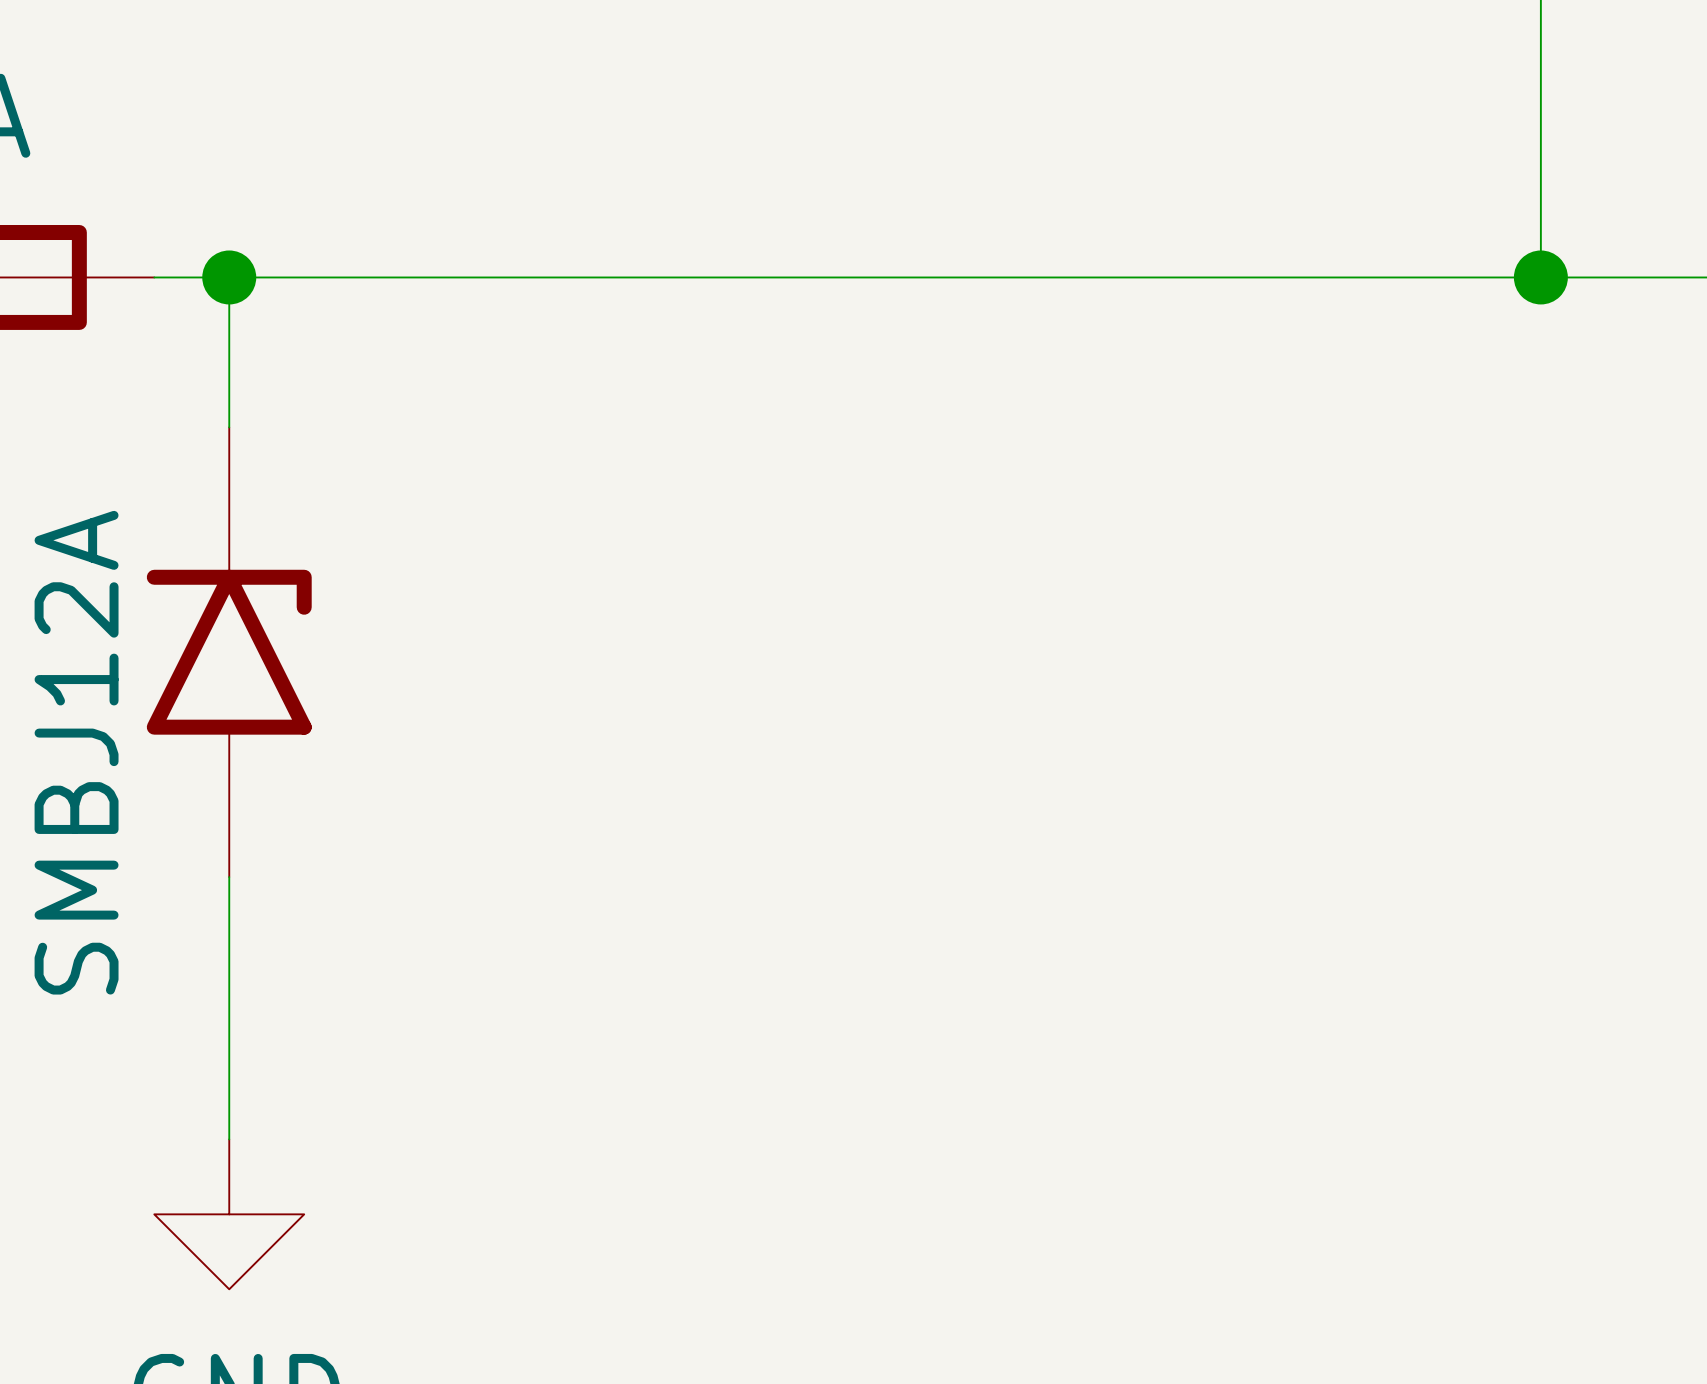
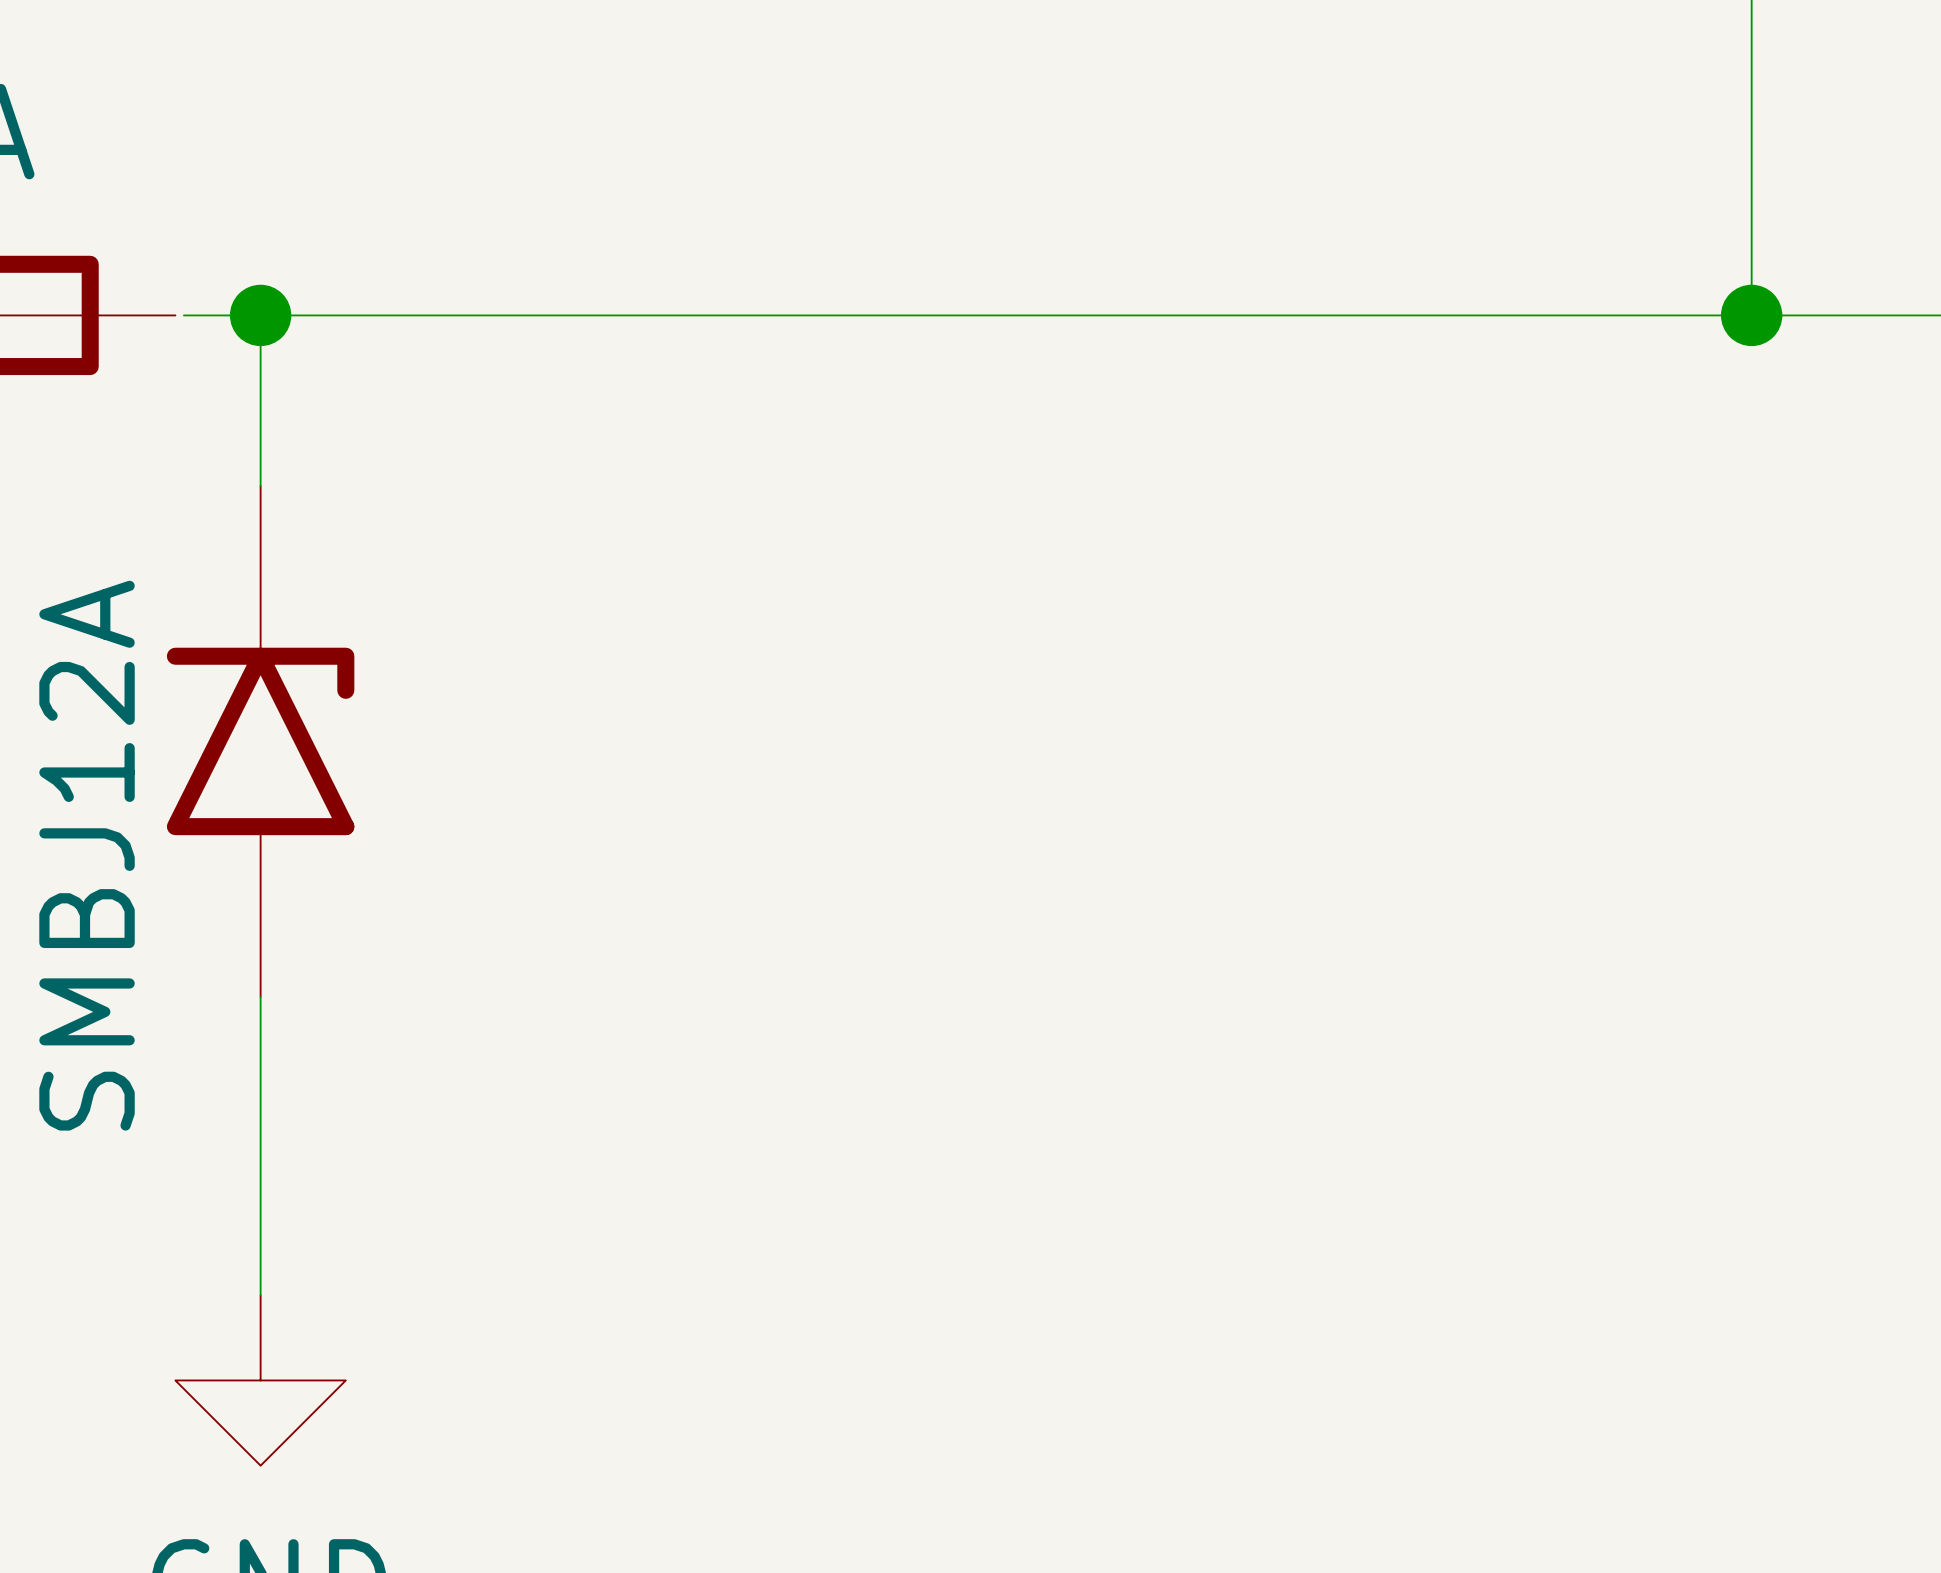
wire: (154, 277) (161, 277) -> none

